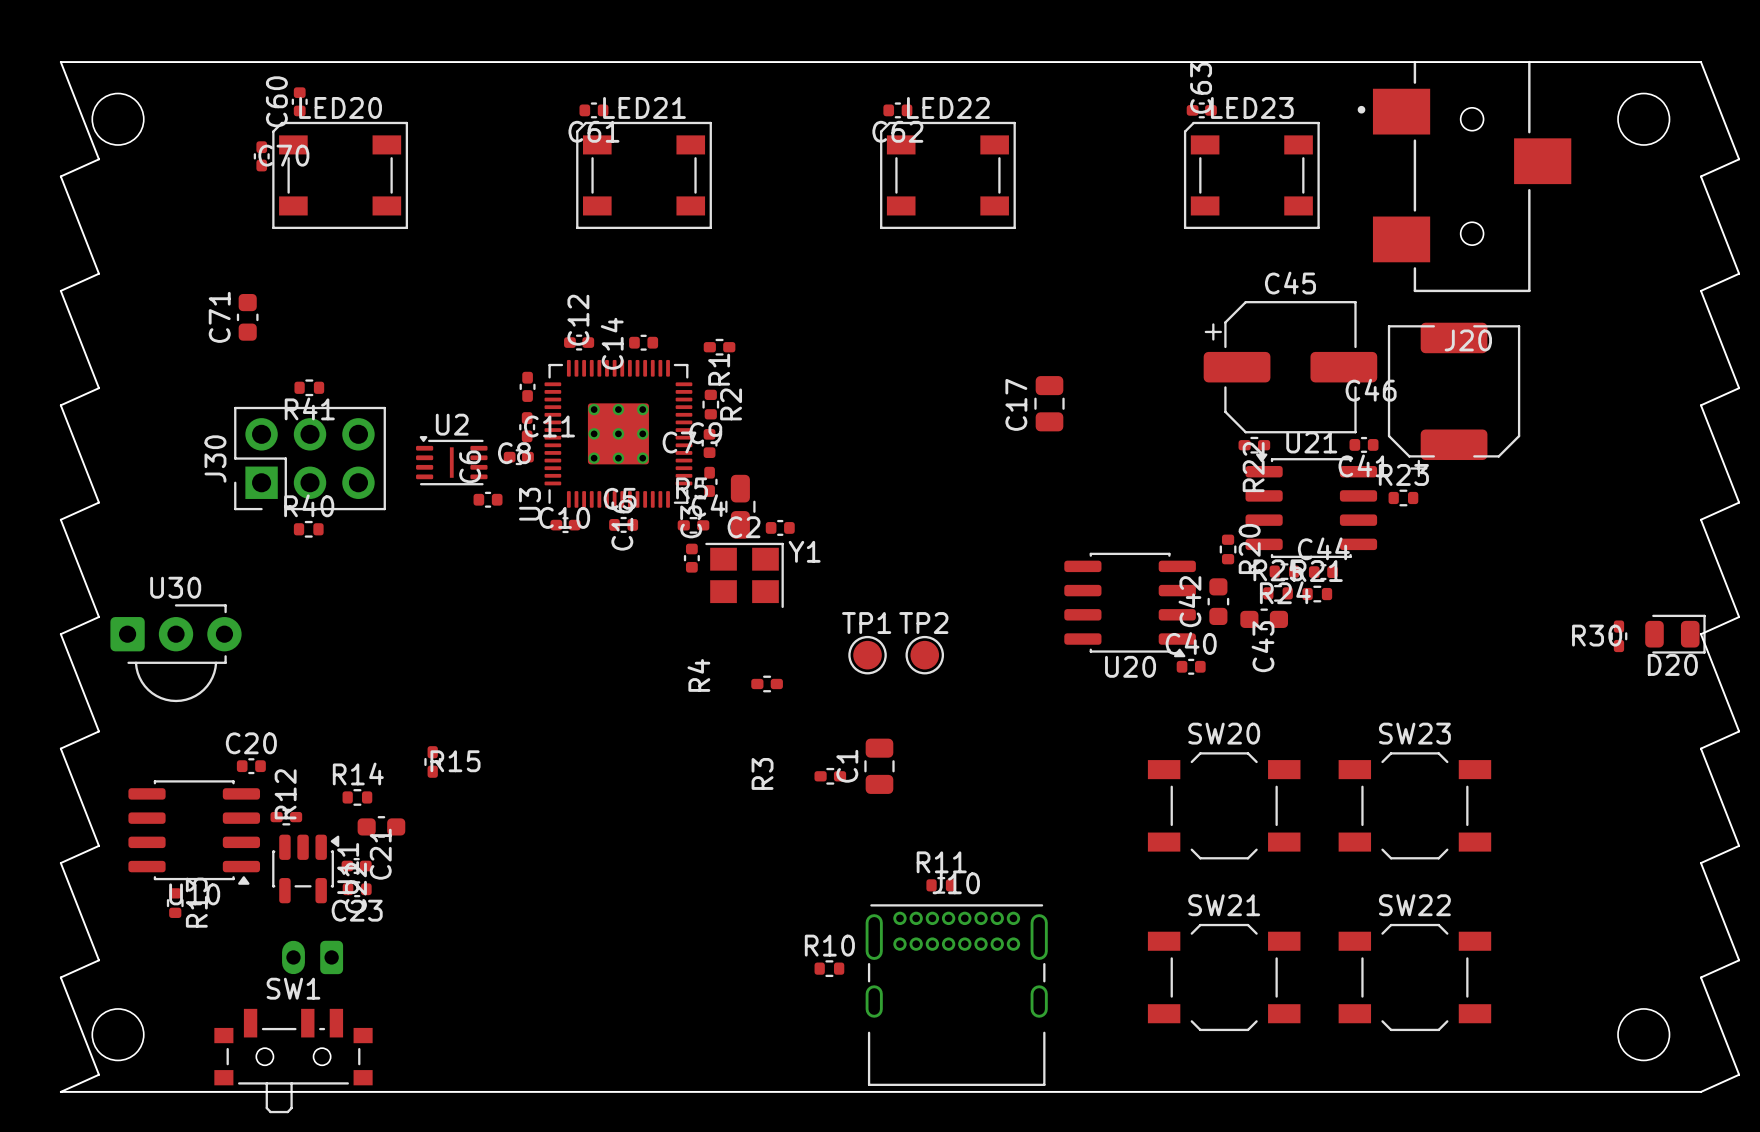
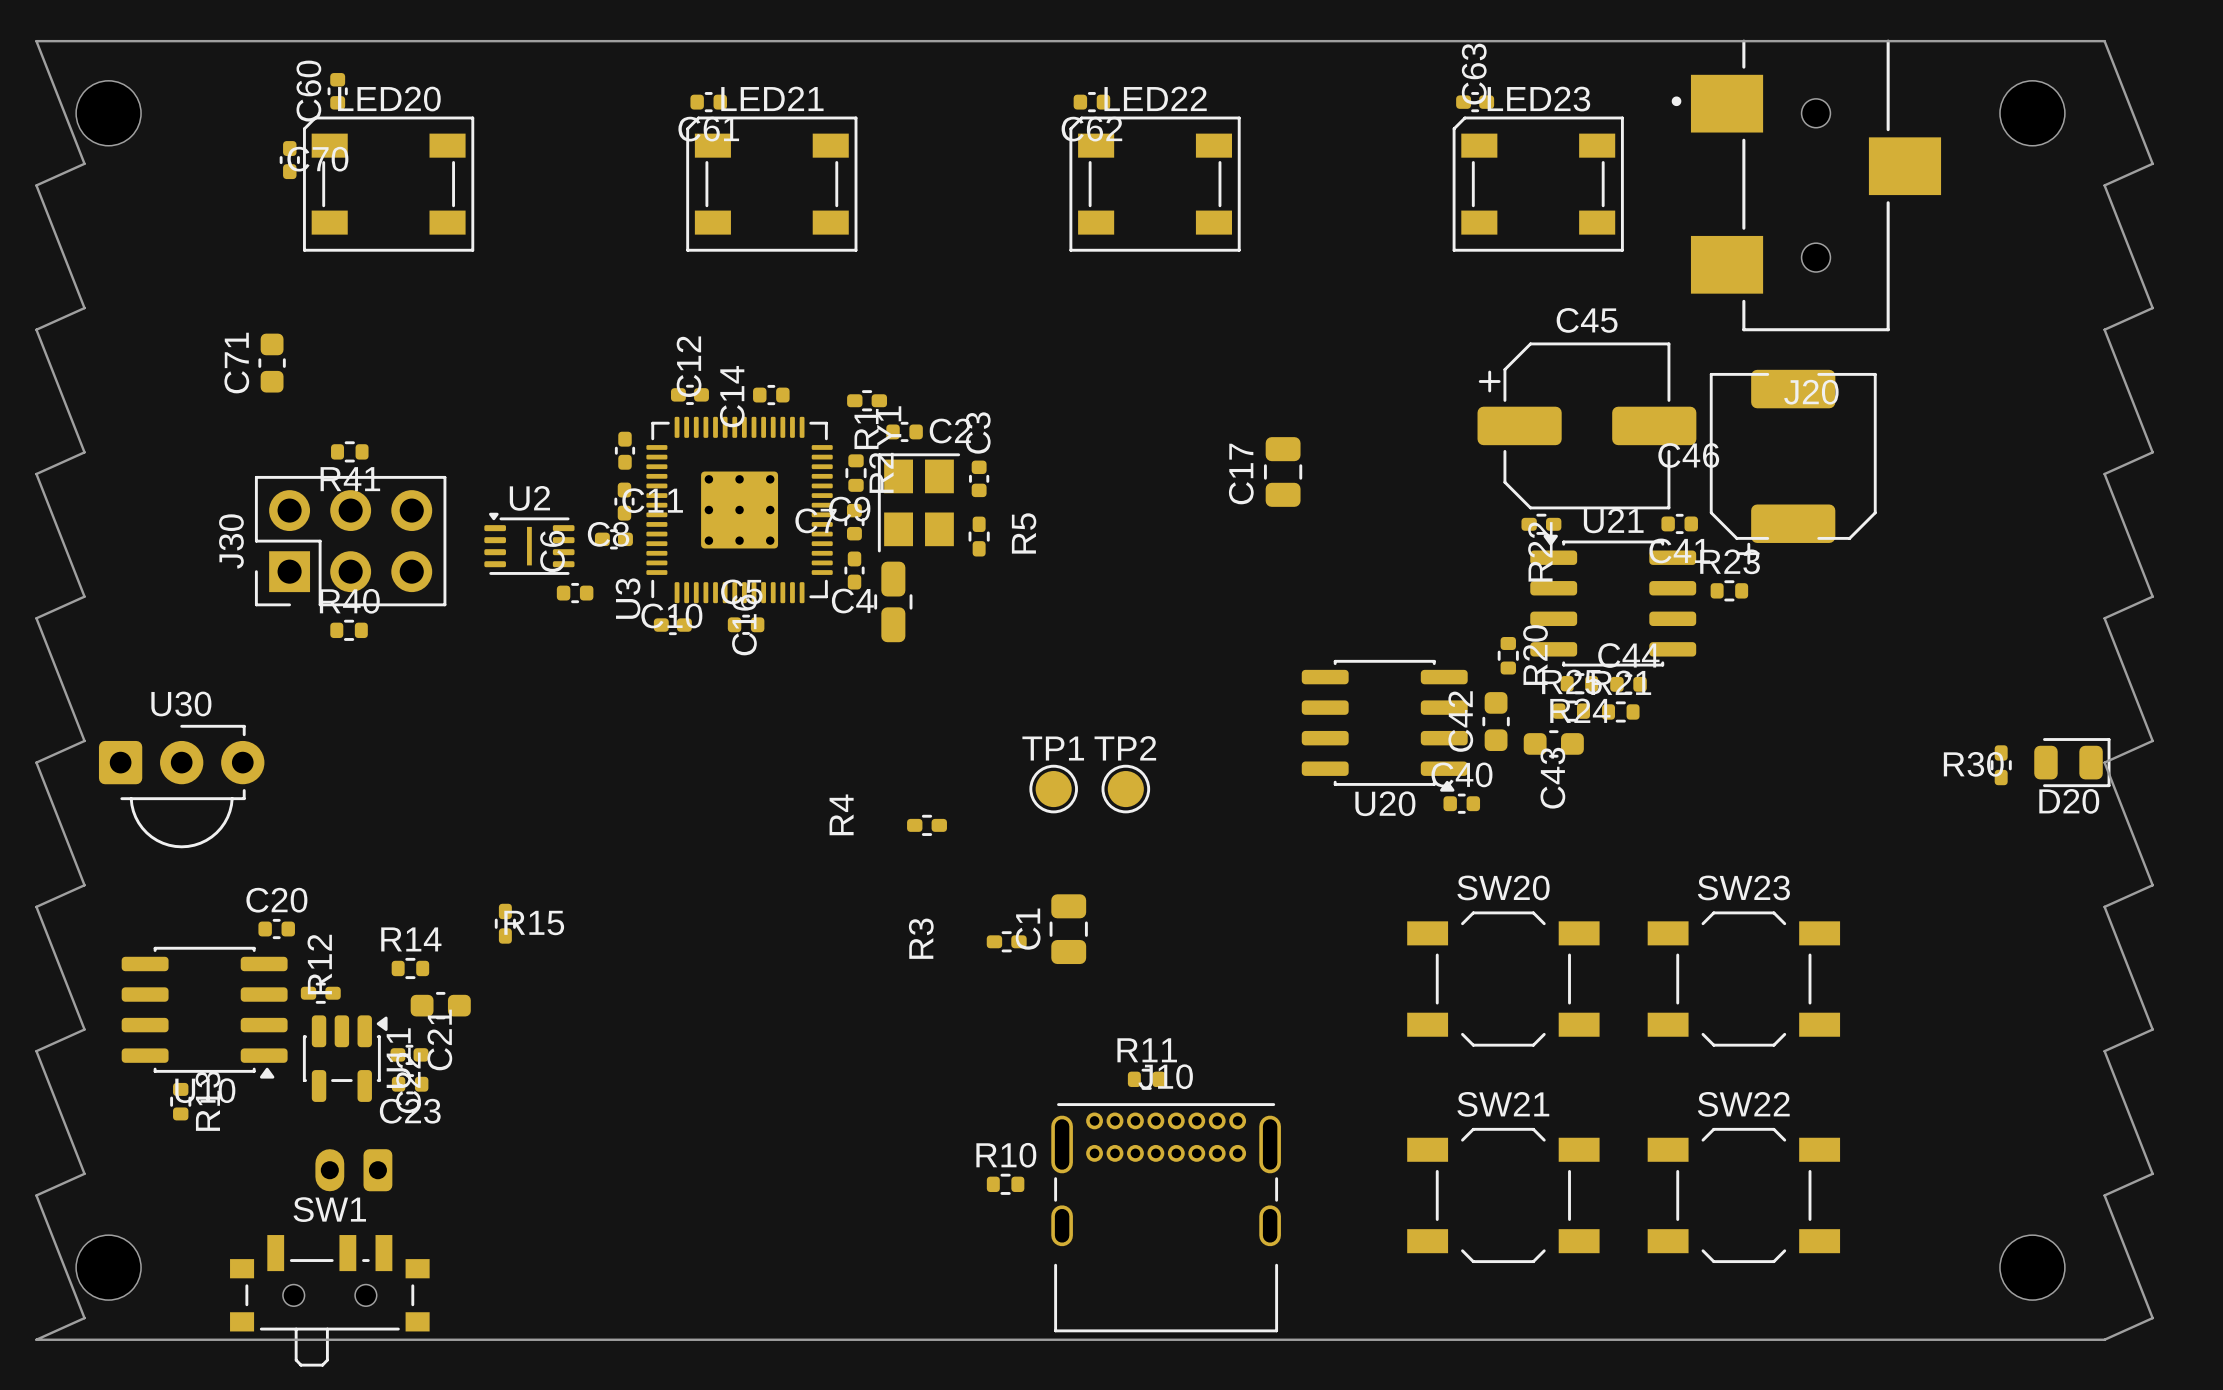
R5 rotation: 0° (693, 525) -> 90° clockwise (979, 536)
R5 position: (693, 525) -> (979, 536)
C2 name position: C2 (744, 527) -> C2 (950, 431)
C2 position: (780, 527) -> (904, 431)
C3 position: (691, 558) -> (979, 478)
Y1 rotation: 0° (744, 575) -> 90° counterclockwise (919, 502)
Y1 position: (744, 575) -> (919, 502)

